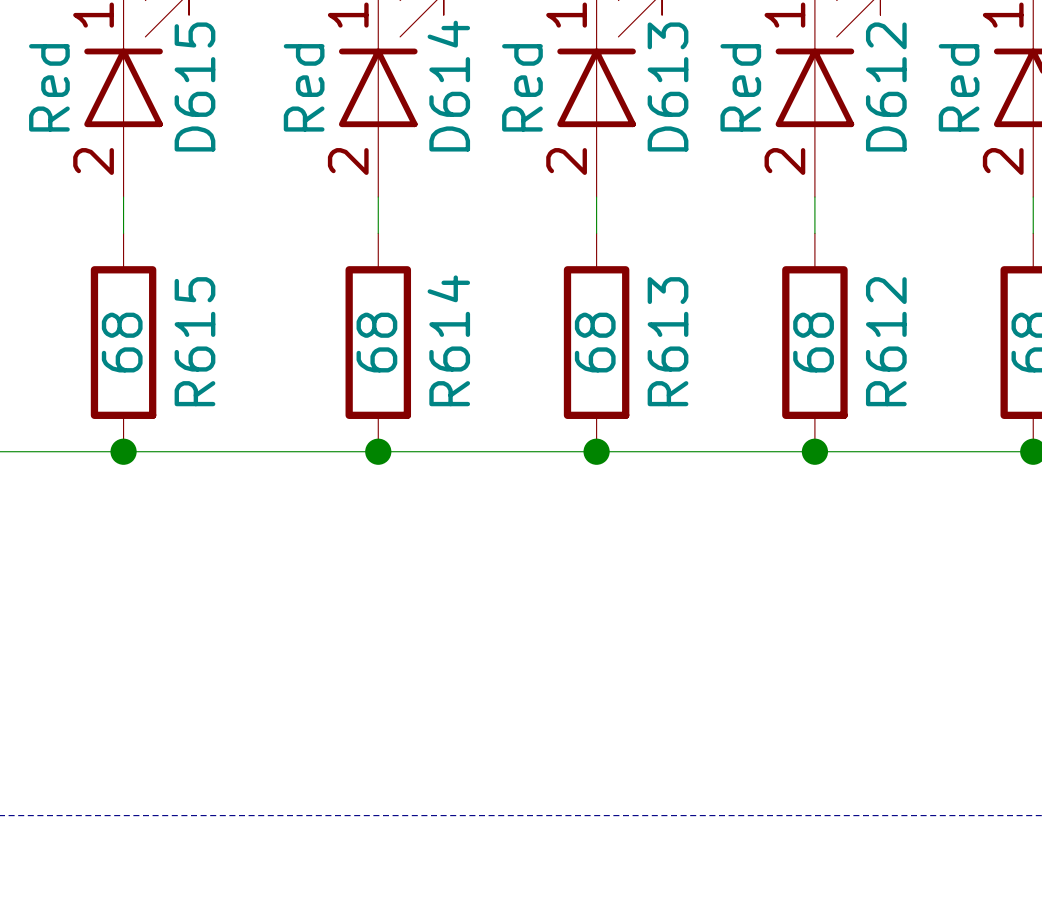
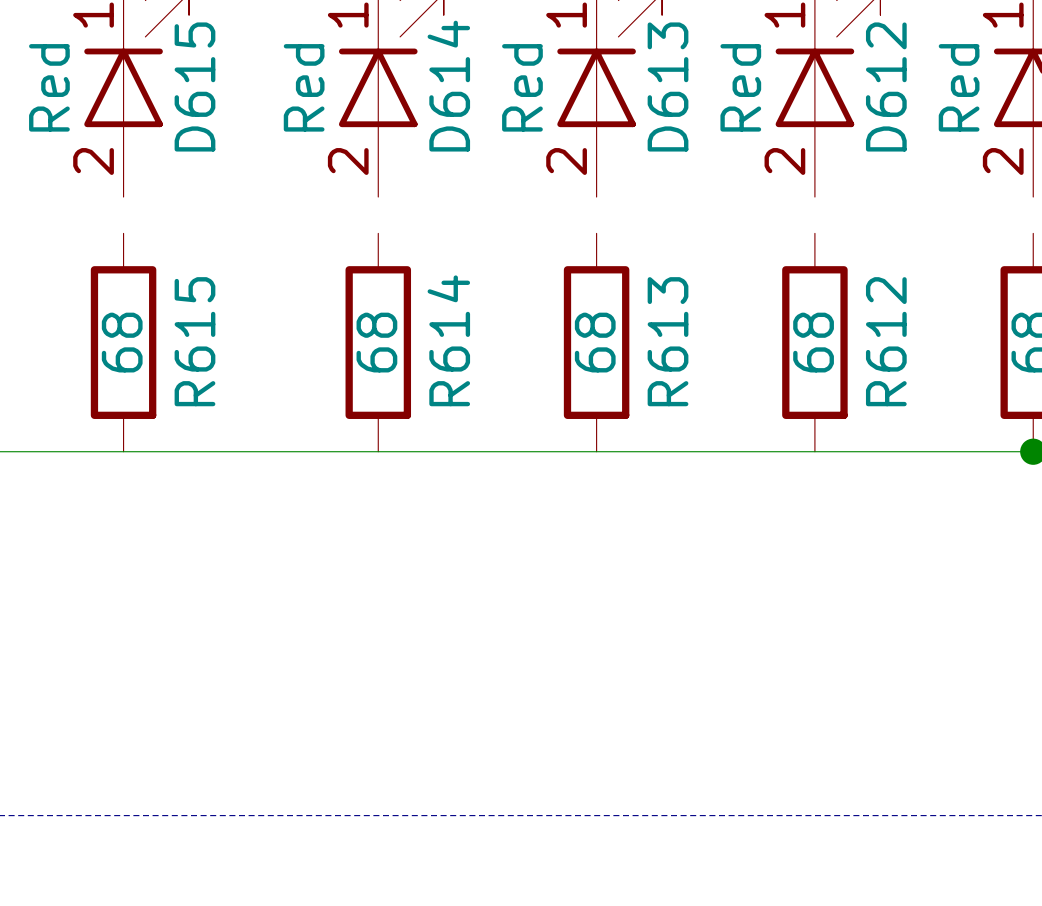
wire: (123, 197) (123, 233) -> none
wire: (378, 197) (378, 233) -> none
wire: (596, 197) (596, 233) -> none
wire: (814, 197) (814, 233) -> none
wire: (1033, 197) (1033, 233) -> none
junction: (123, 451) -> none
junction: (378, 451) -> none
junction: (596, 451) -> none
junction: (814, 451) -> none

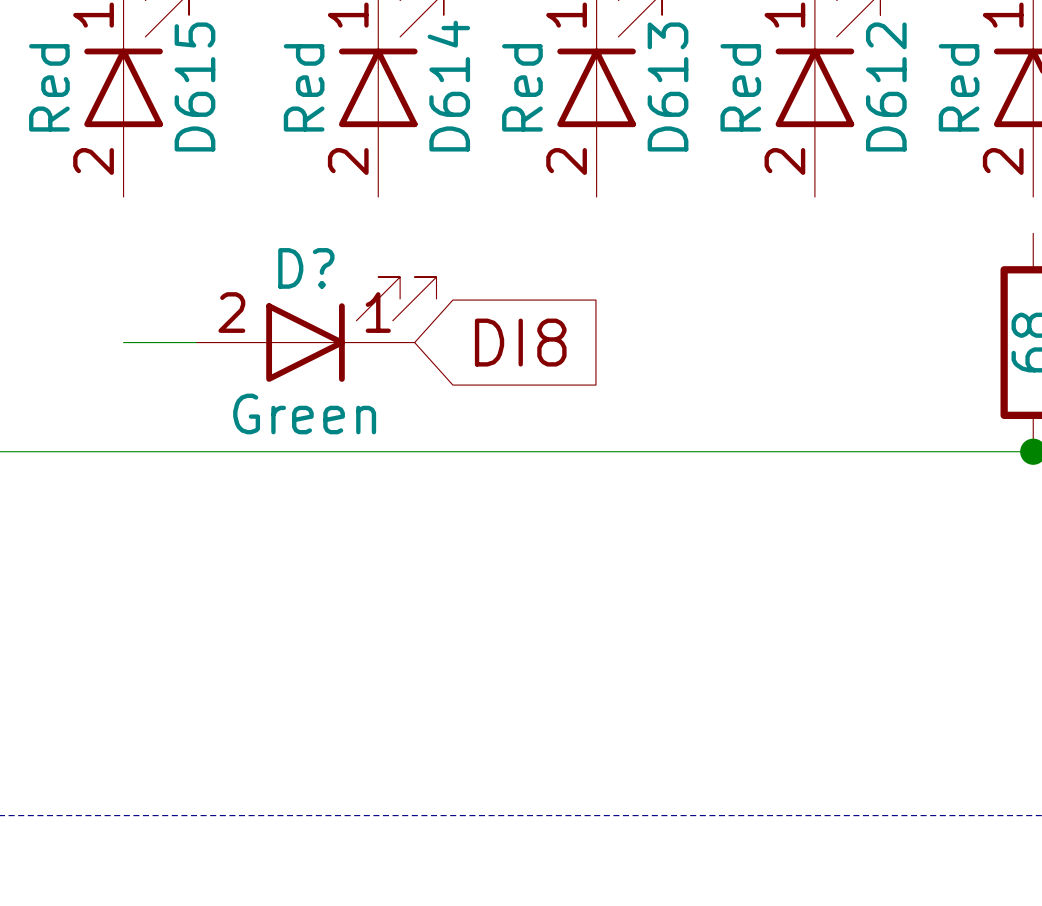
D?: none -> Green (316, 329)
wire: none -> (123, 342) (196, 342)
R615: 68 (123, 342) -> none
R614: 68 (378, 342) -> none
global label: none -> DI8 (520, 342)
R613: 68 (596, 342) -> none
R612: 68 (814, 342) -> none

